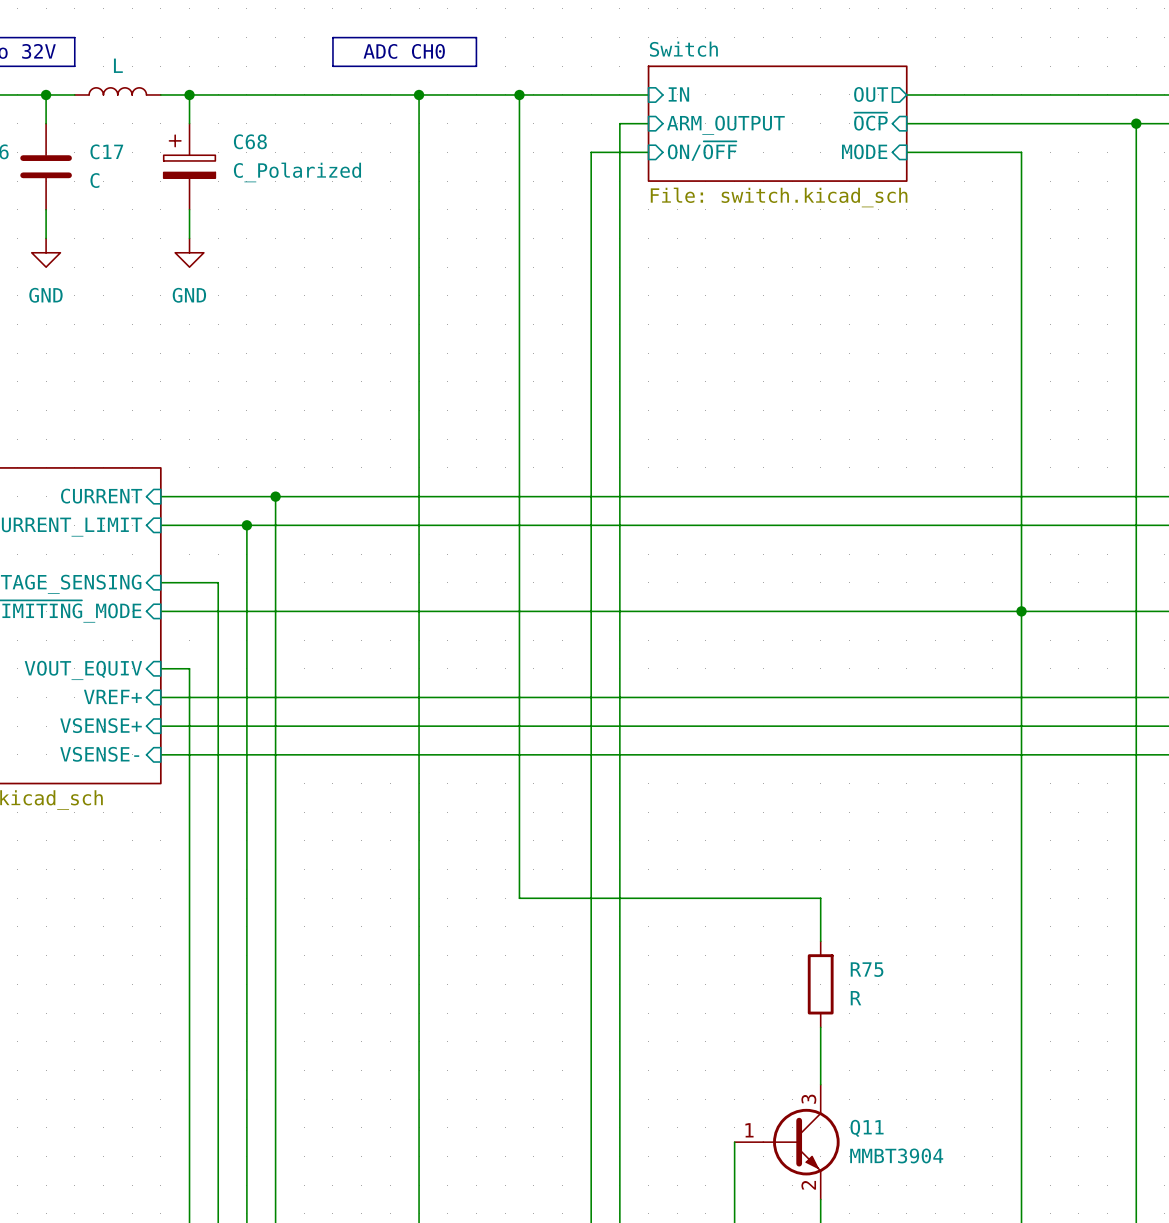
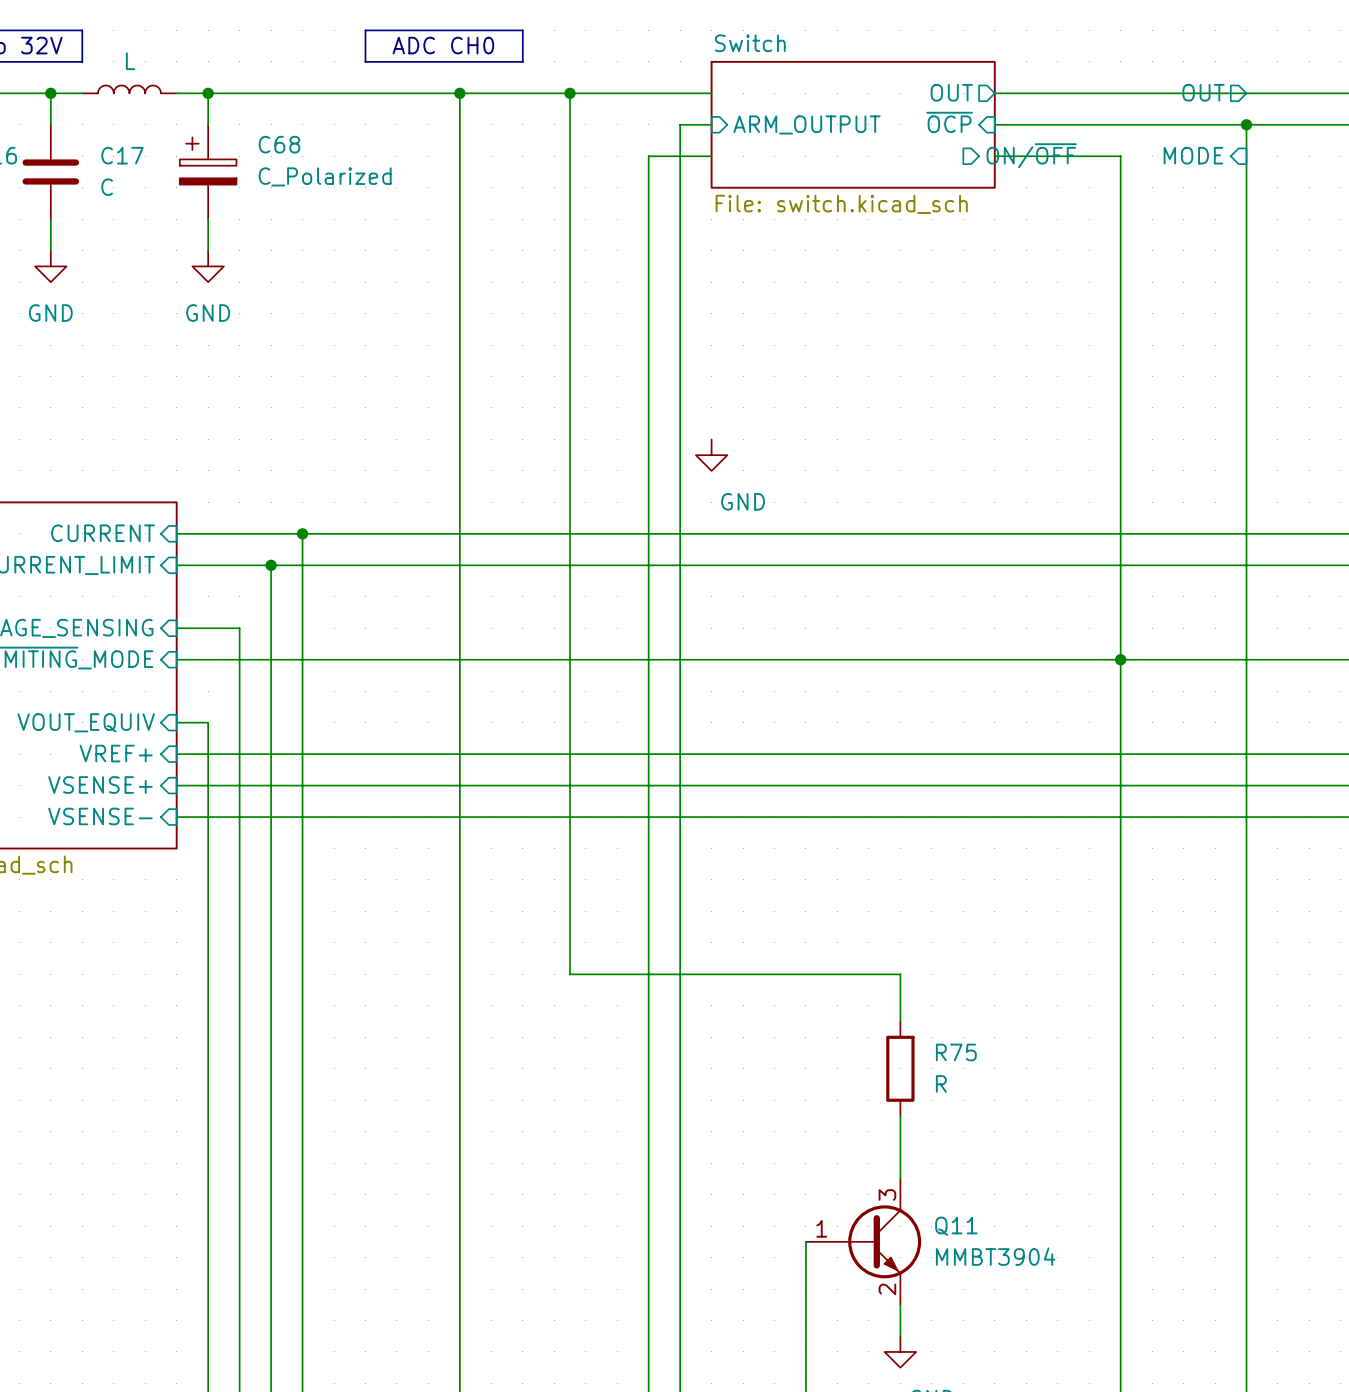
sheet pin: IN (678, 94) -> none
sheet pin: none -> OUT (1203, 92)
sheet pin position: ON/~{OFF} (702, 151) -> ON/~{OFF} (1031, 155)
sheet pin position: MODE (864, 151) -> MODE (1193, 155)
power symbol: none -> GND (711, 455)

